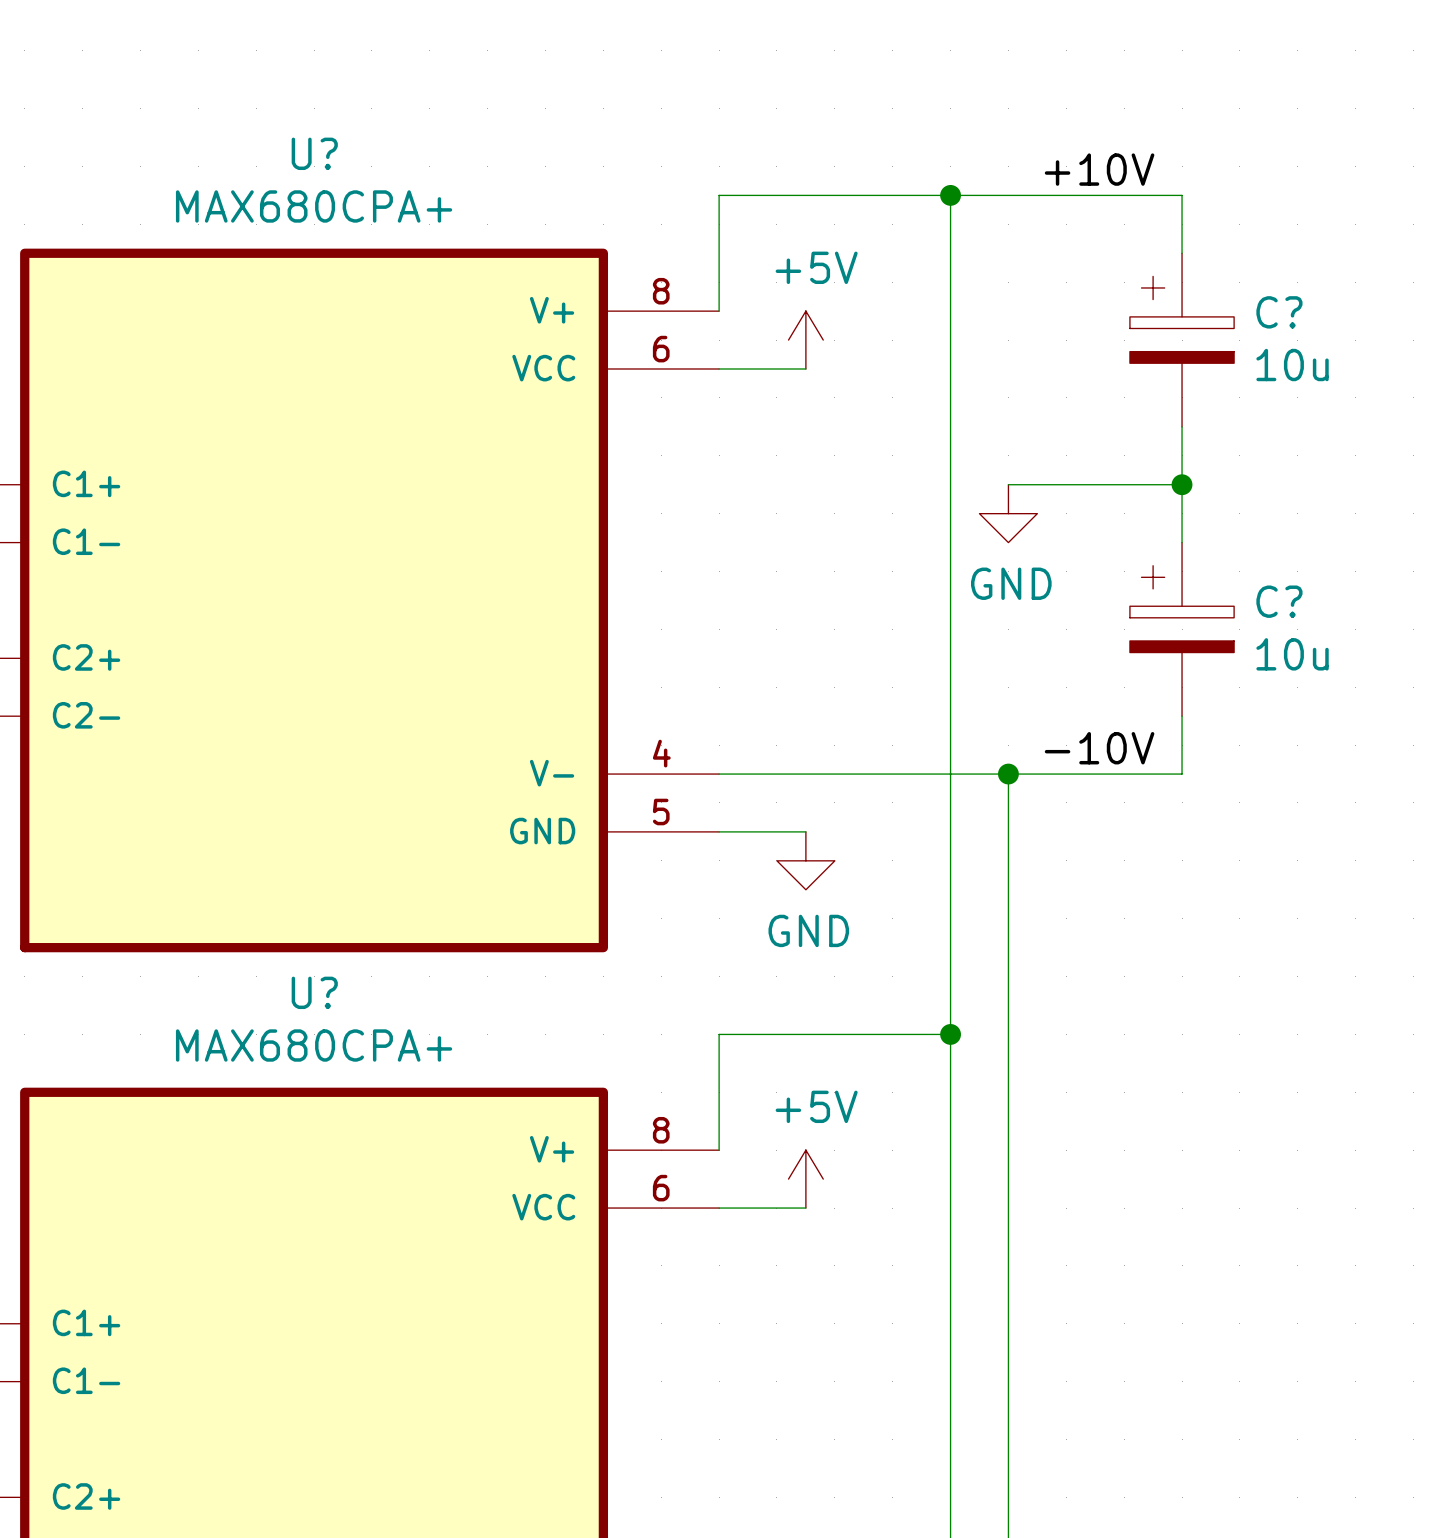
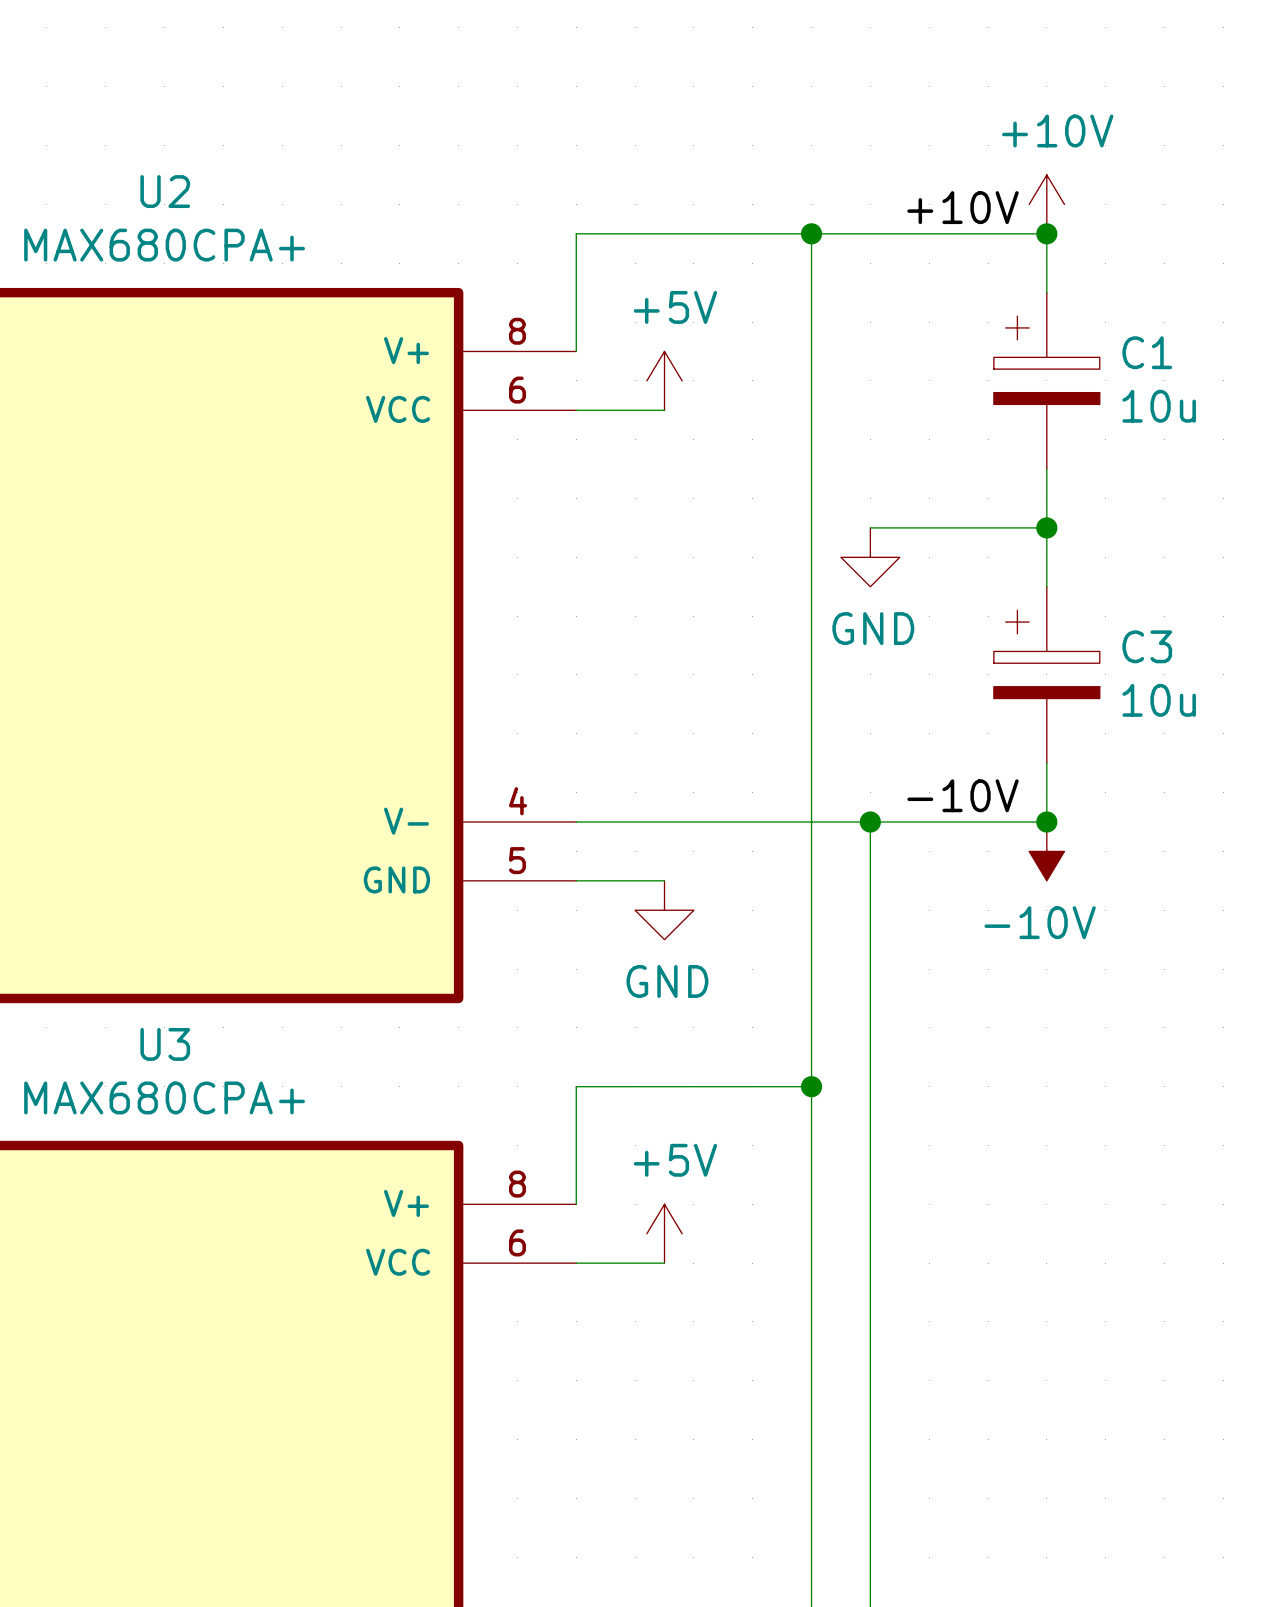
U? name: U? (314, 153) -> U2 (165, 191)
power symbol: none -> +10V (1046, 204)
junction: none -> (1046, 233)
C? name: C? (1279, 312) -> C1 (1147, 352)
C? name: C? (1279, 601) -> C3 (1147, 646)
junction: none -> (1046, 822)
power symbol: none -> -10V (1046, 851)
U? name: U? (314, 992) -> U3 (165, 1044)

